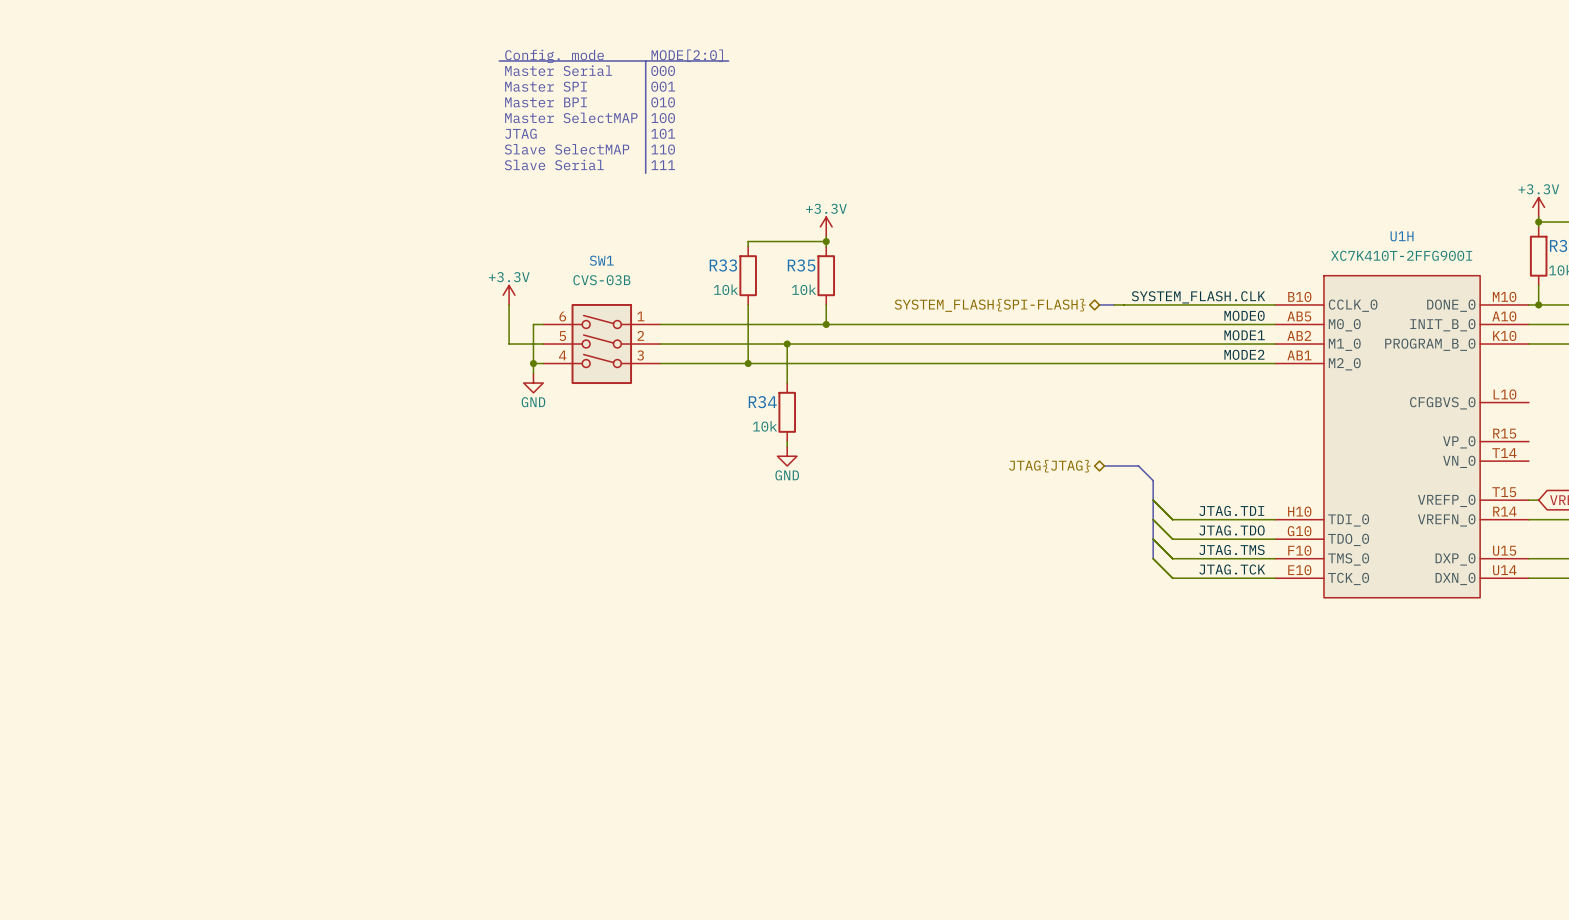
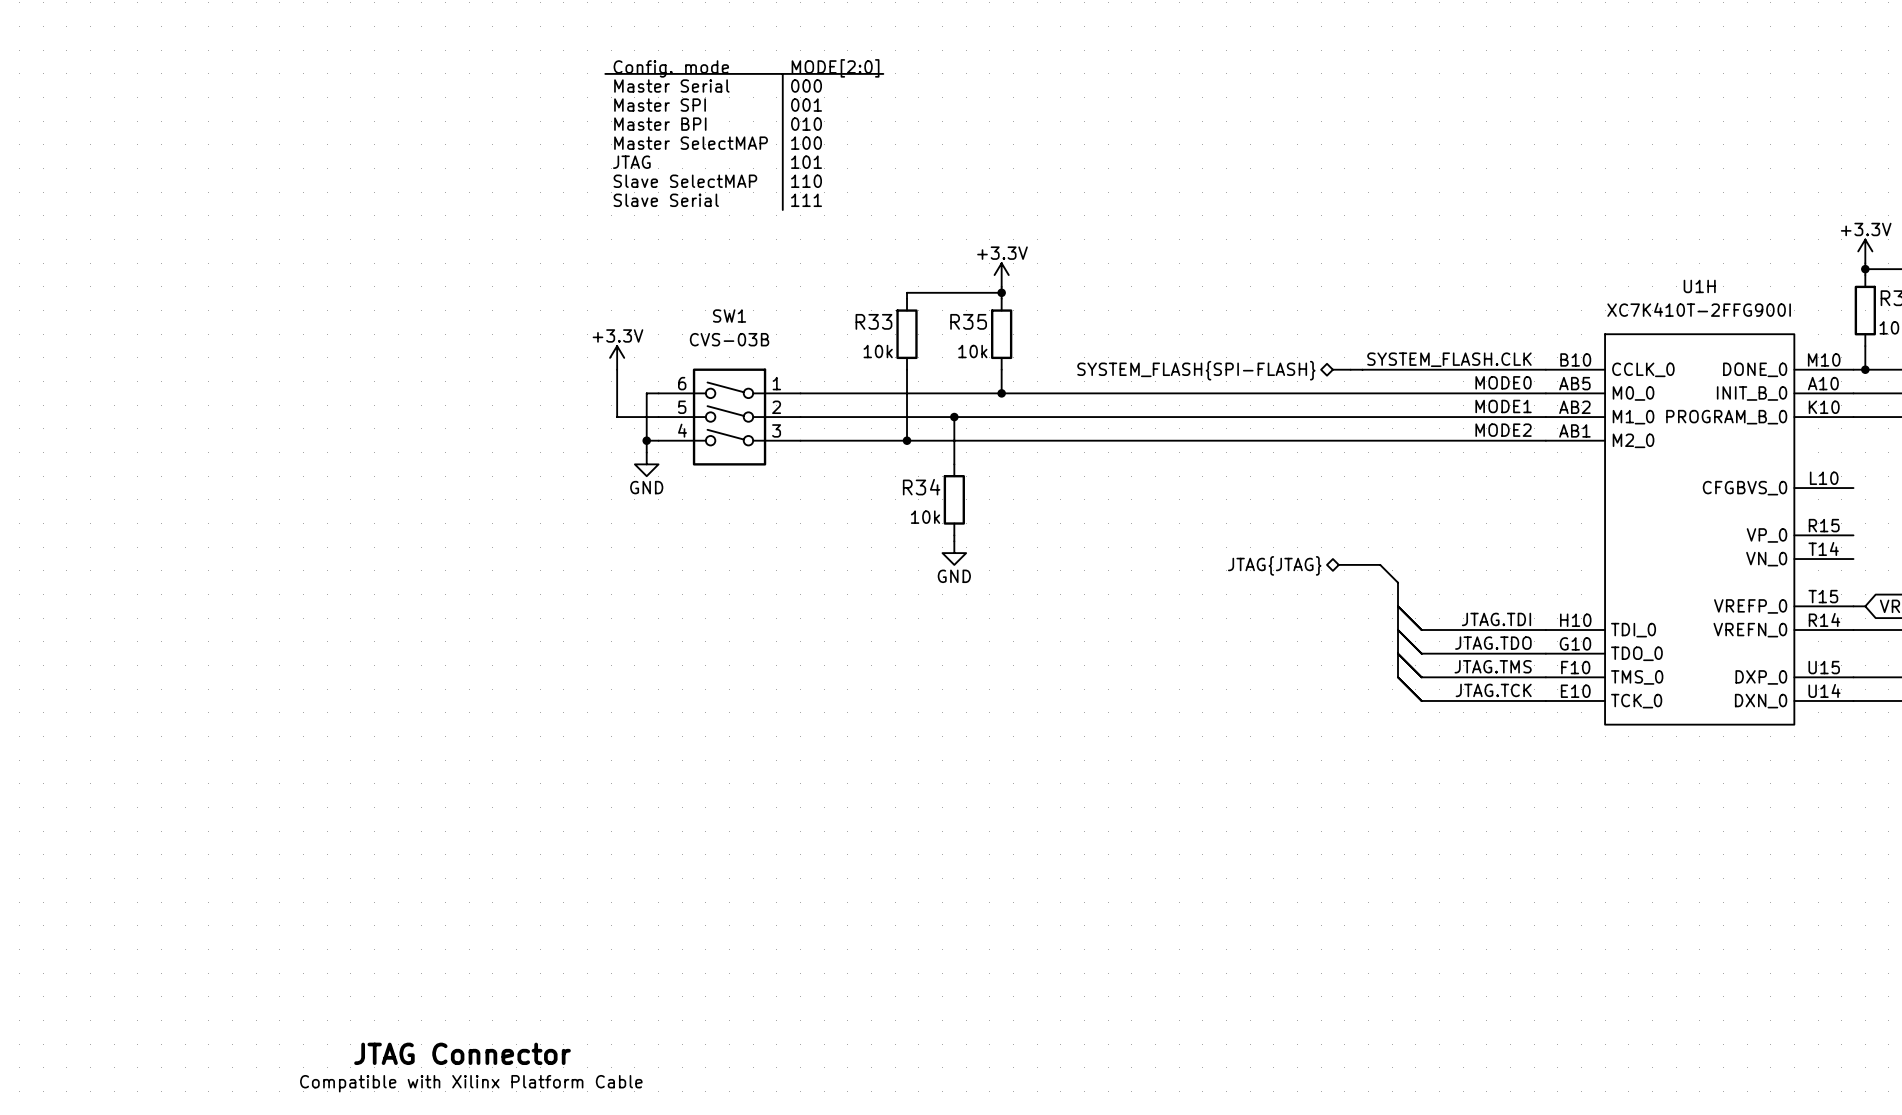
text: none -> JTAG Connector (462, 1053)
text: none -> Compatible with Xilinx Platform Cable (471, 1083)

